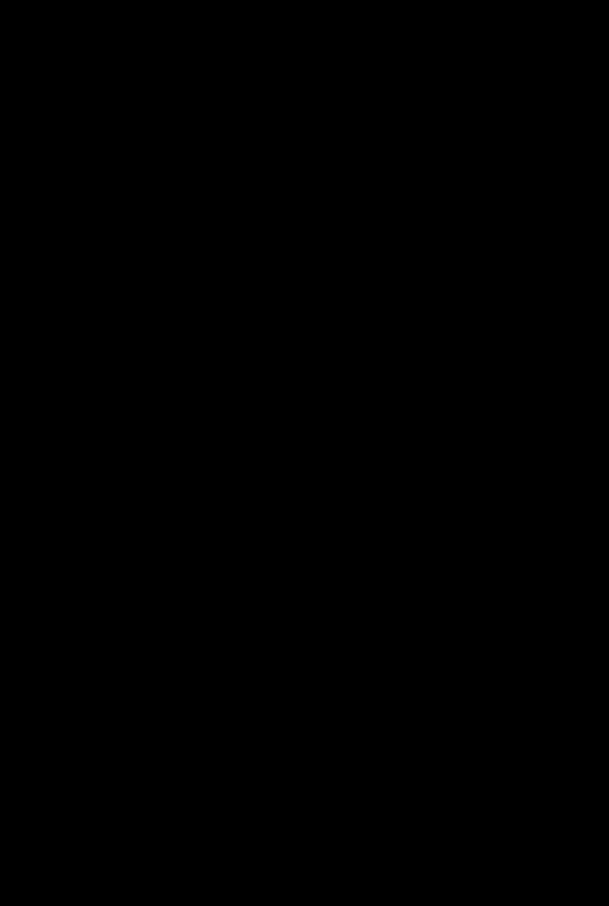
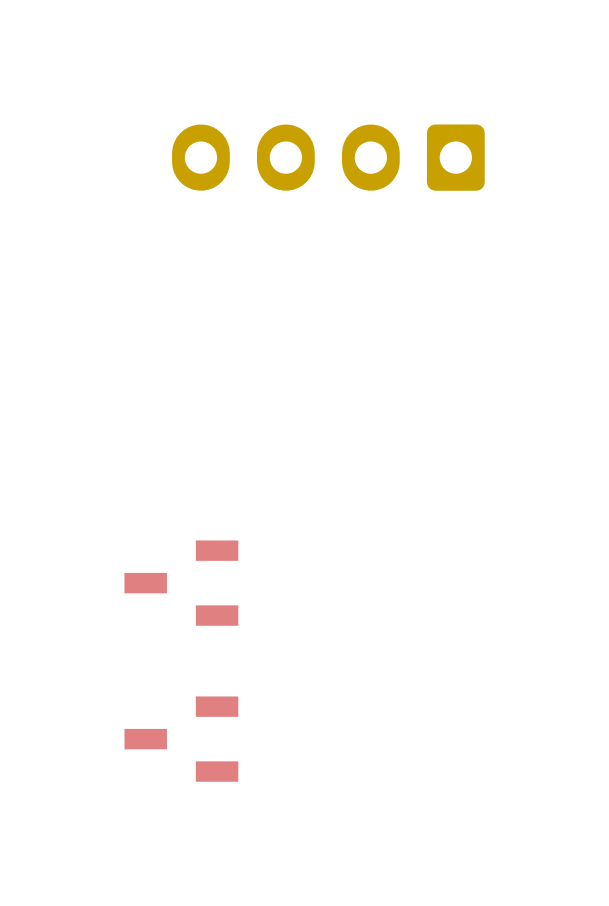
part: none -> (328, 157)
part: none -> (181, 583)
part: none -> (181, 739)

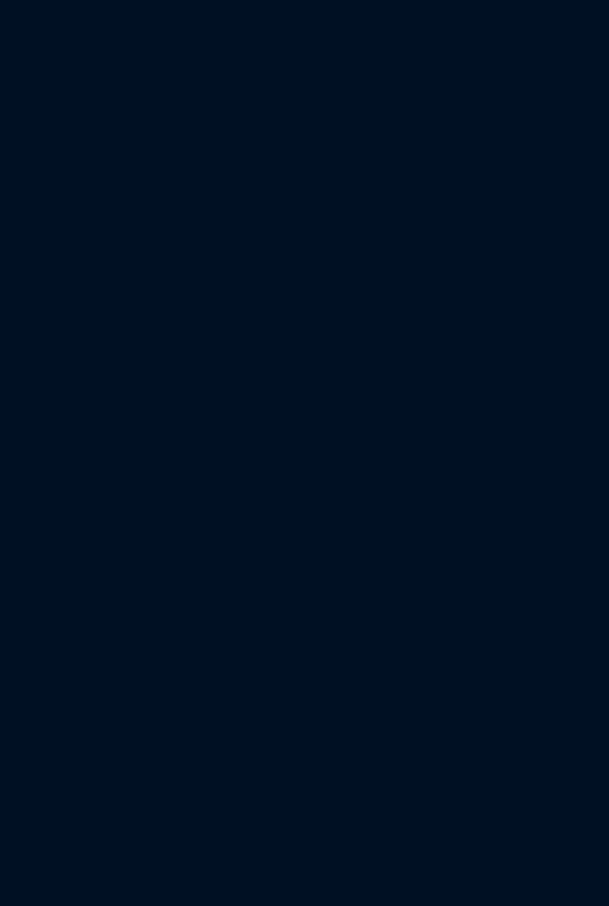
part: (328, 157) -> none
part: (181, 583) -> none
part: (181, 739) -> none

